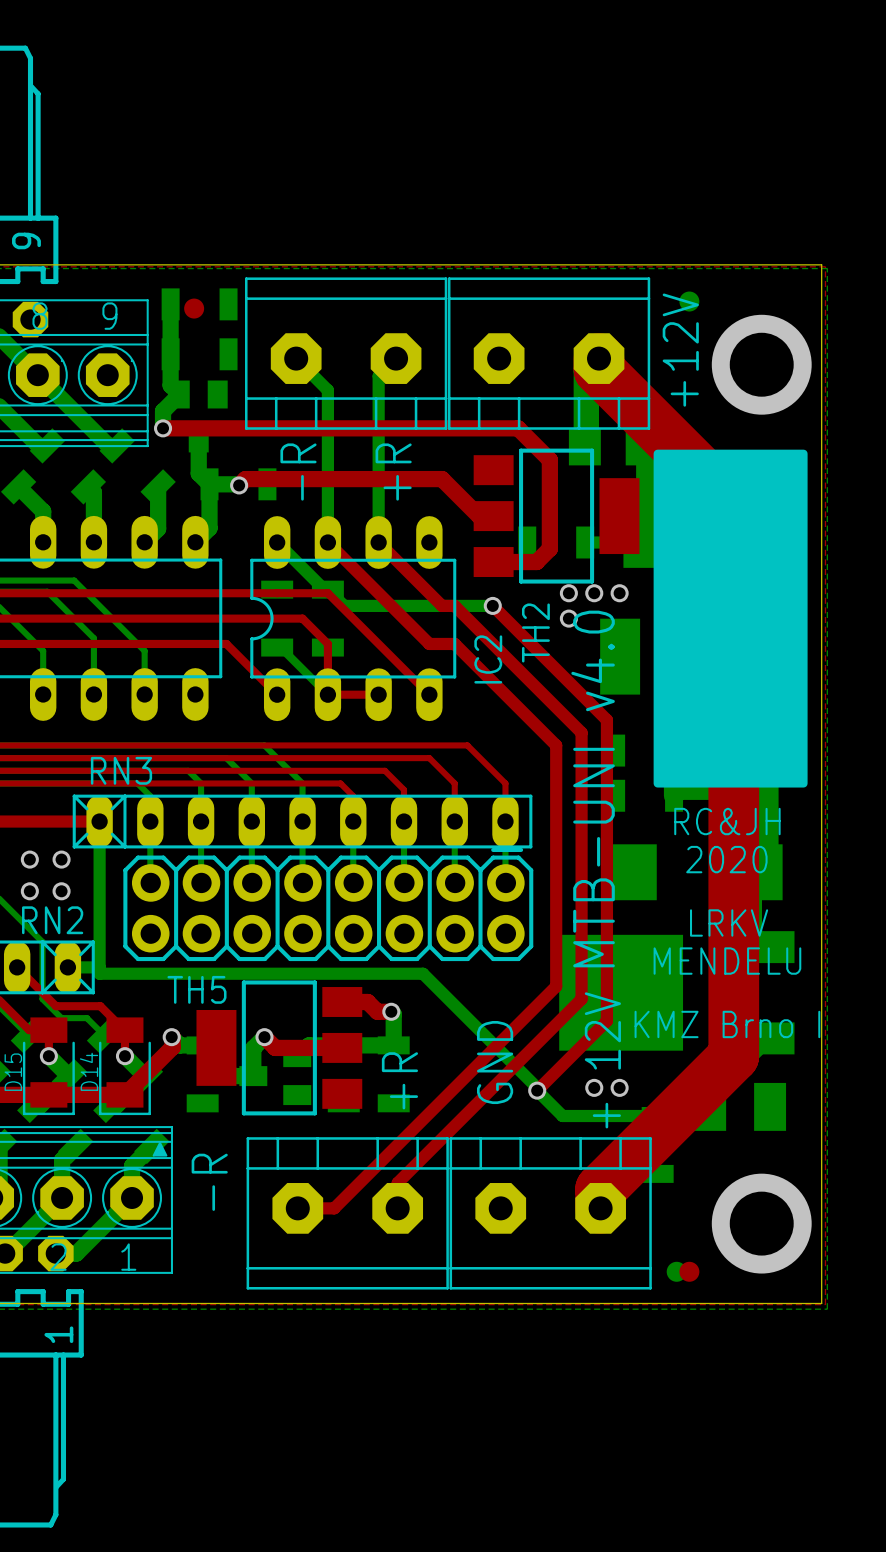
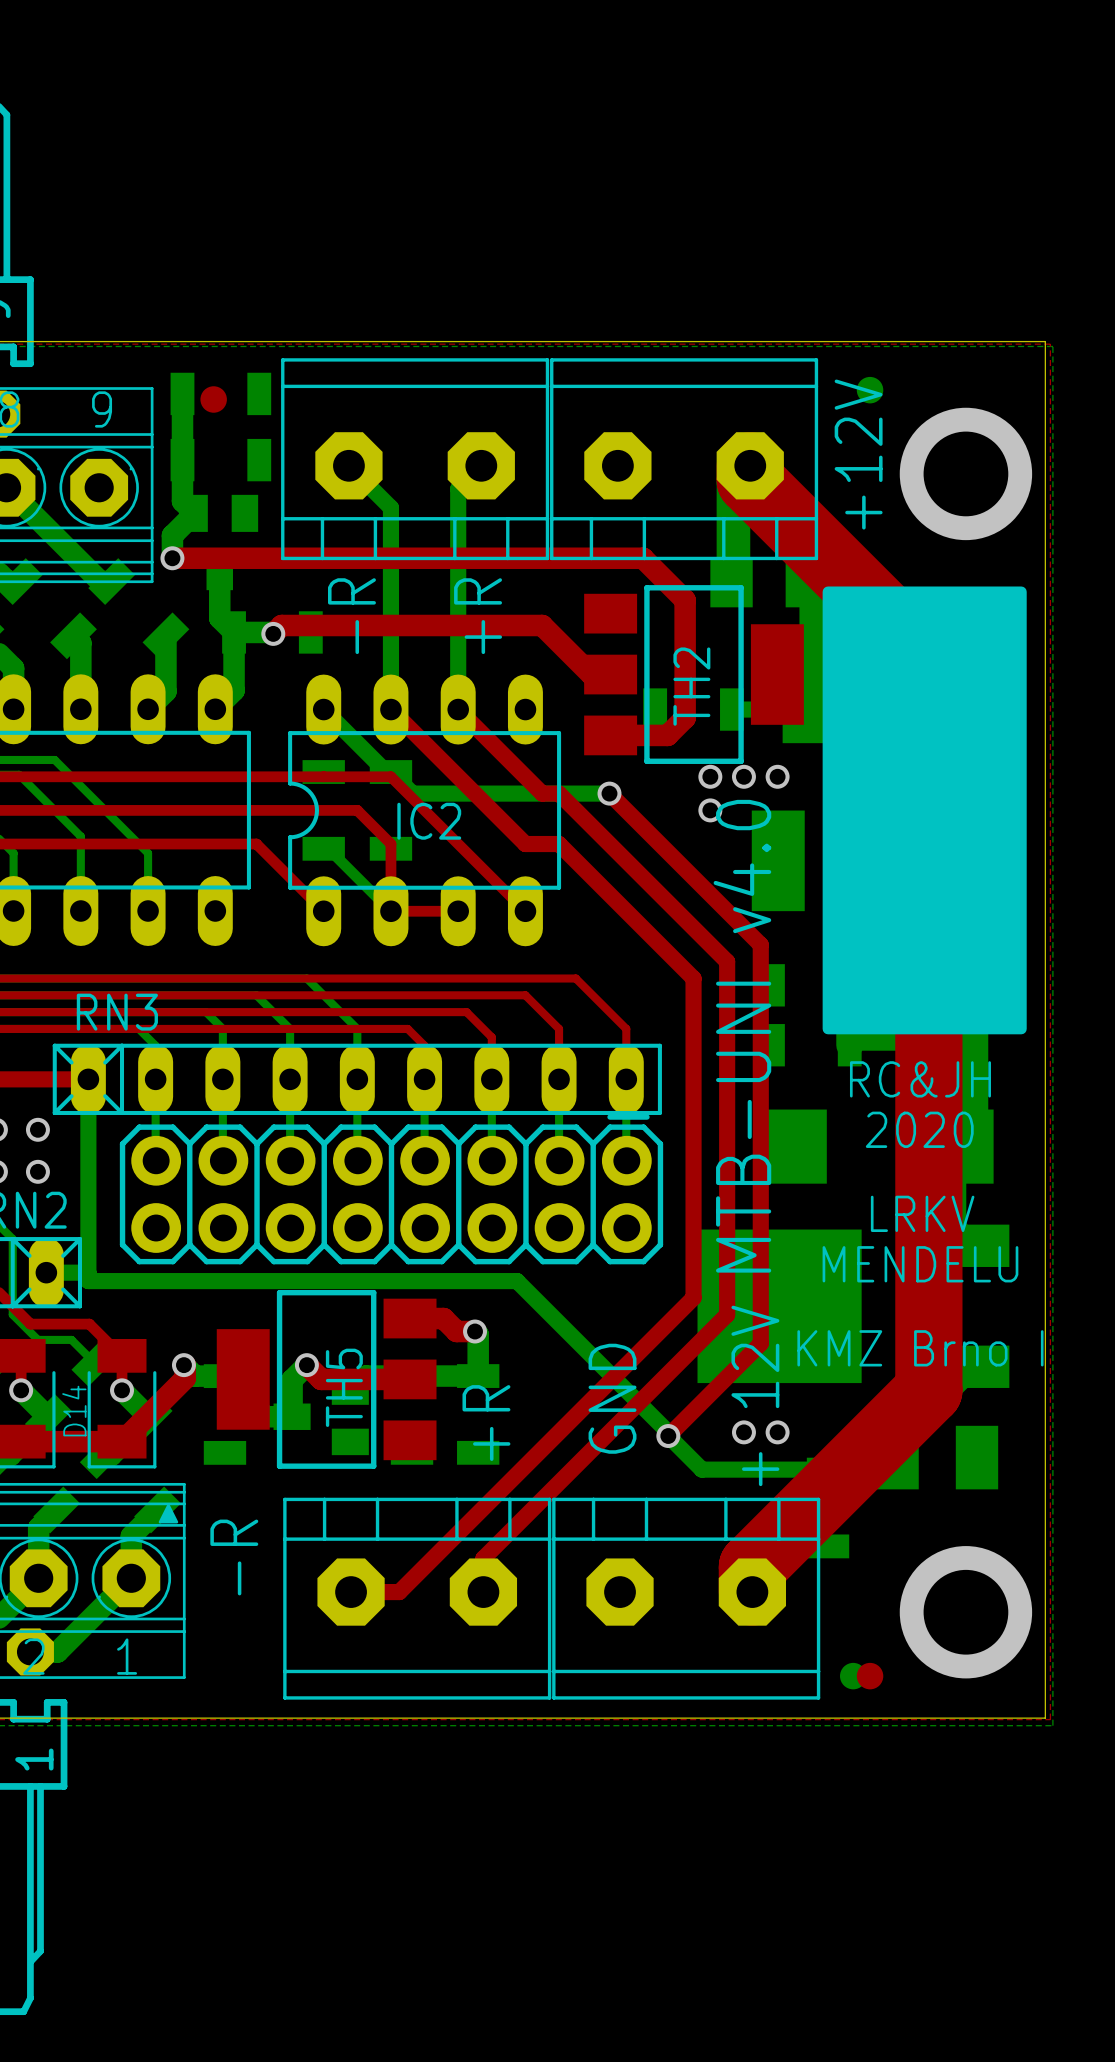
TH2 name position: TH2 (535, 632) -> TH2 (691, 686)
IC2 name rotation: 0° (488, 659) -> 90° clockwise (429, 821)
IC2 name position: IC2 (488, 659) -> IC2 (429, 821)
TH5 name rotation: 0° (196, 989) -> 90° counterclockwise (344, 1387)
TH5 name position: TH5 (196, 989) -> TH5 (344, 1387)

